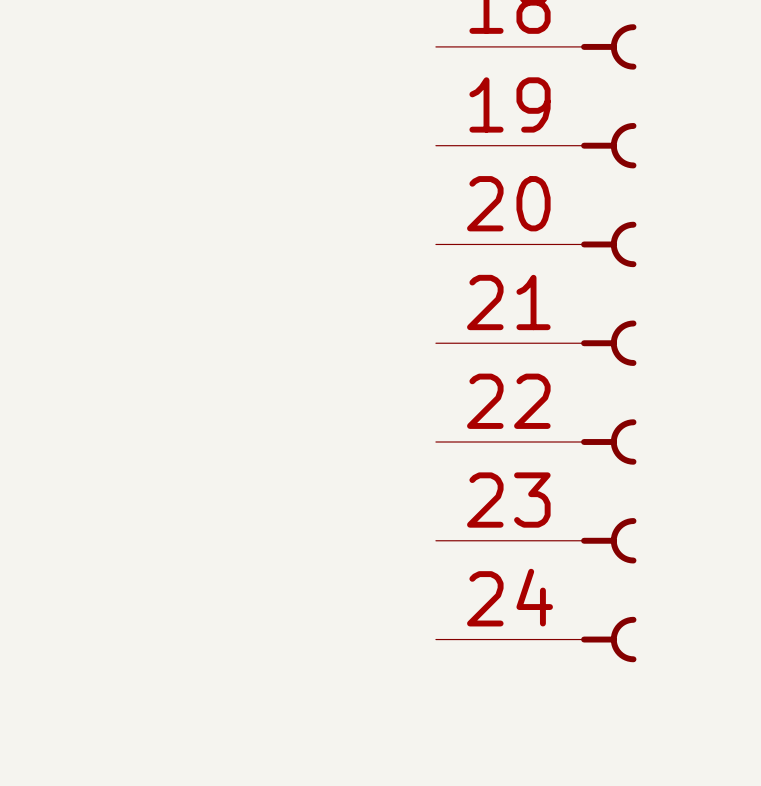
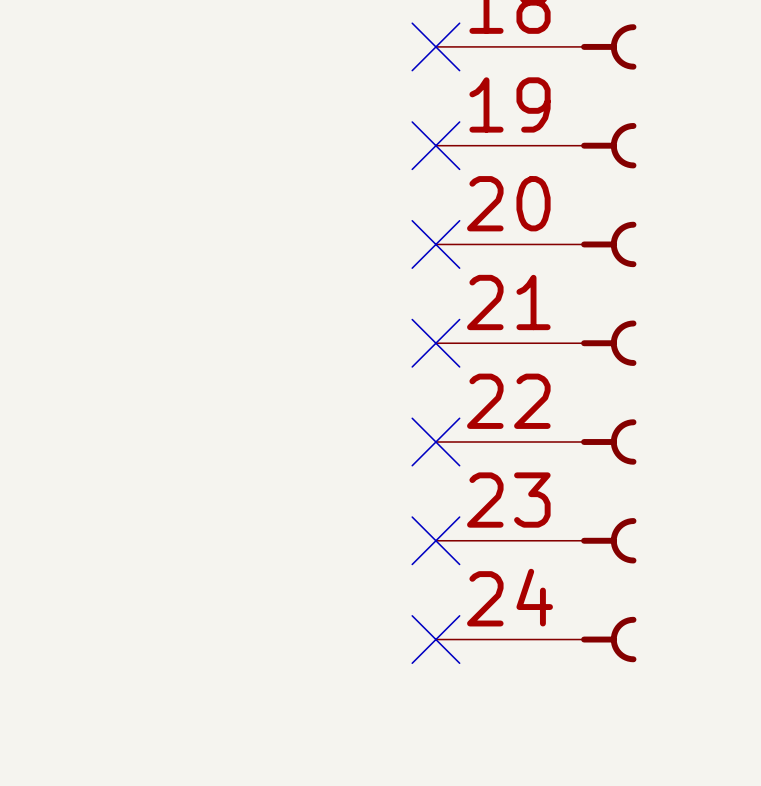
no-connect mark: none -> (435, 46)
no-connect mark: none -> (435, 145)
no-connect mark: none -> (435, 244)
no-connect mark: none -> (435, 343)
no-connect mark: none -> (435, 442)
no-connect mark: none -> (435, 540)
no-connect mark: none -> (435, 639)

